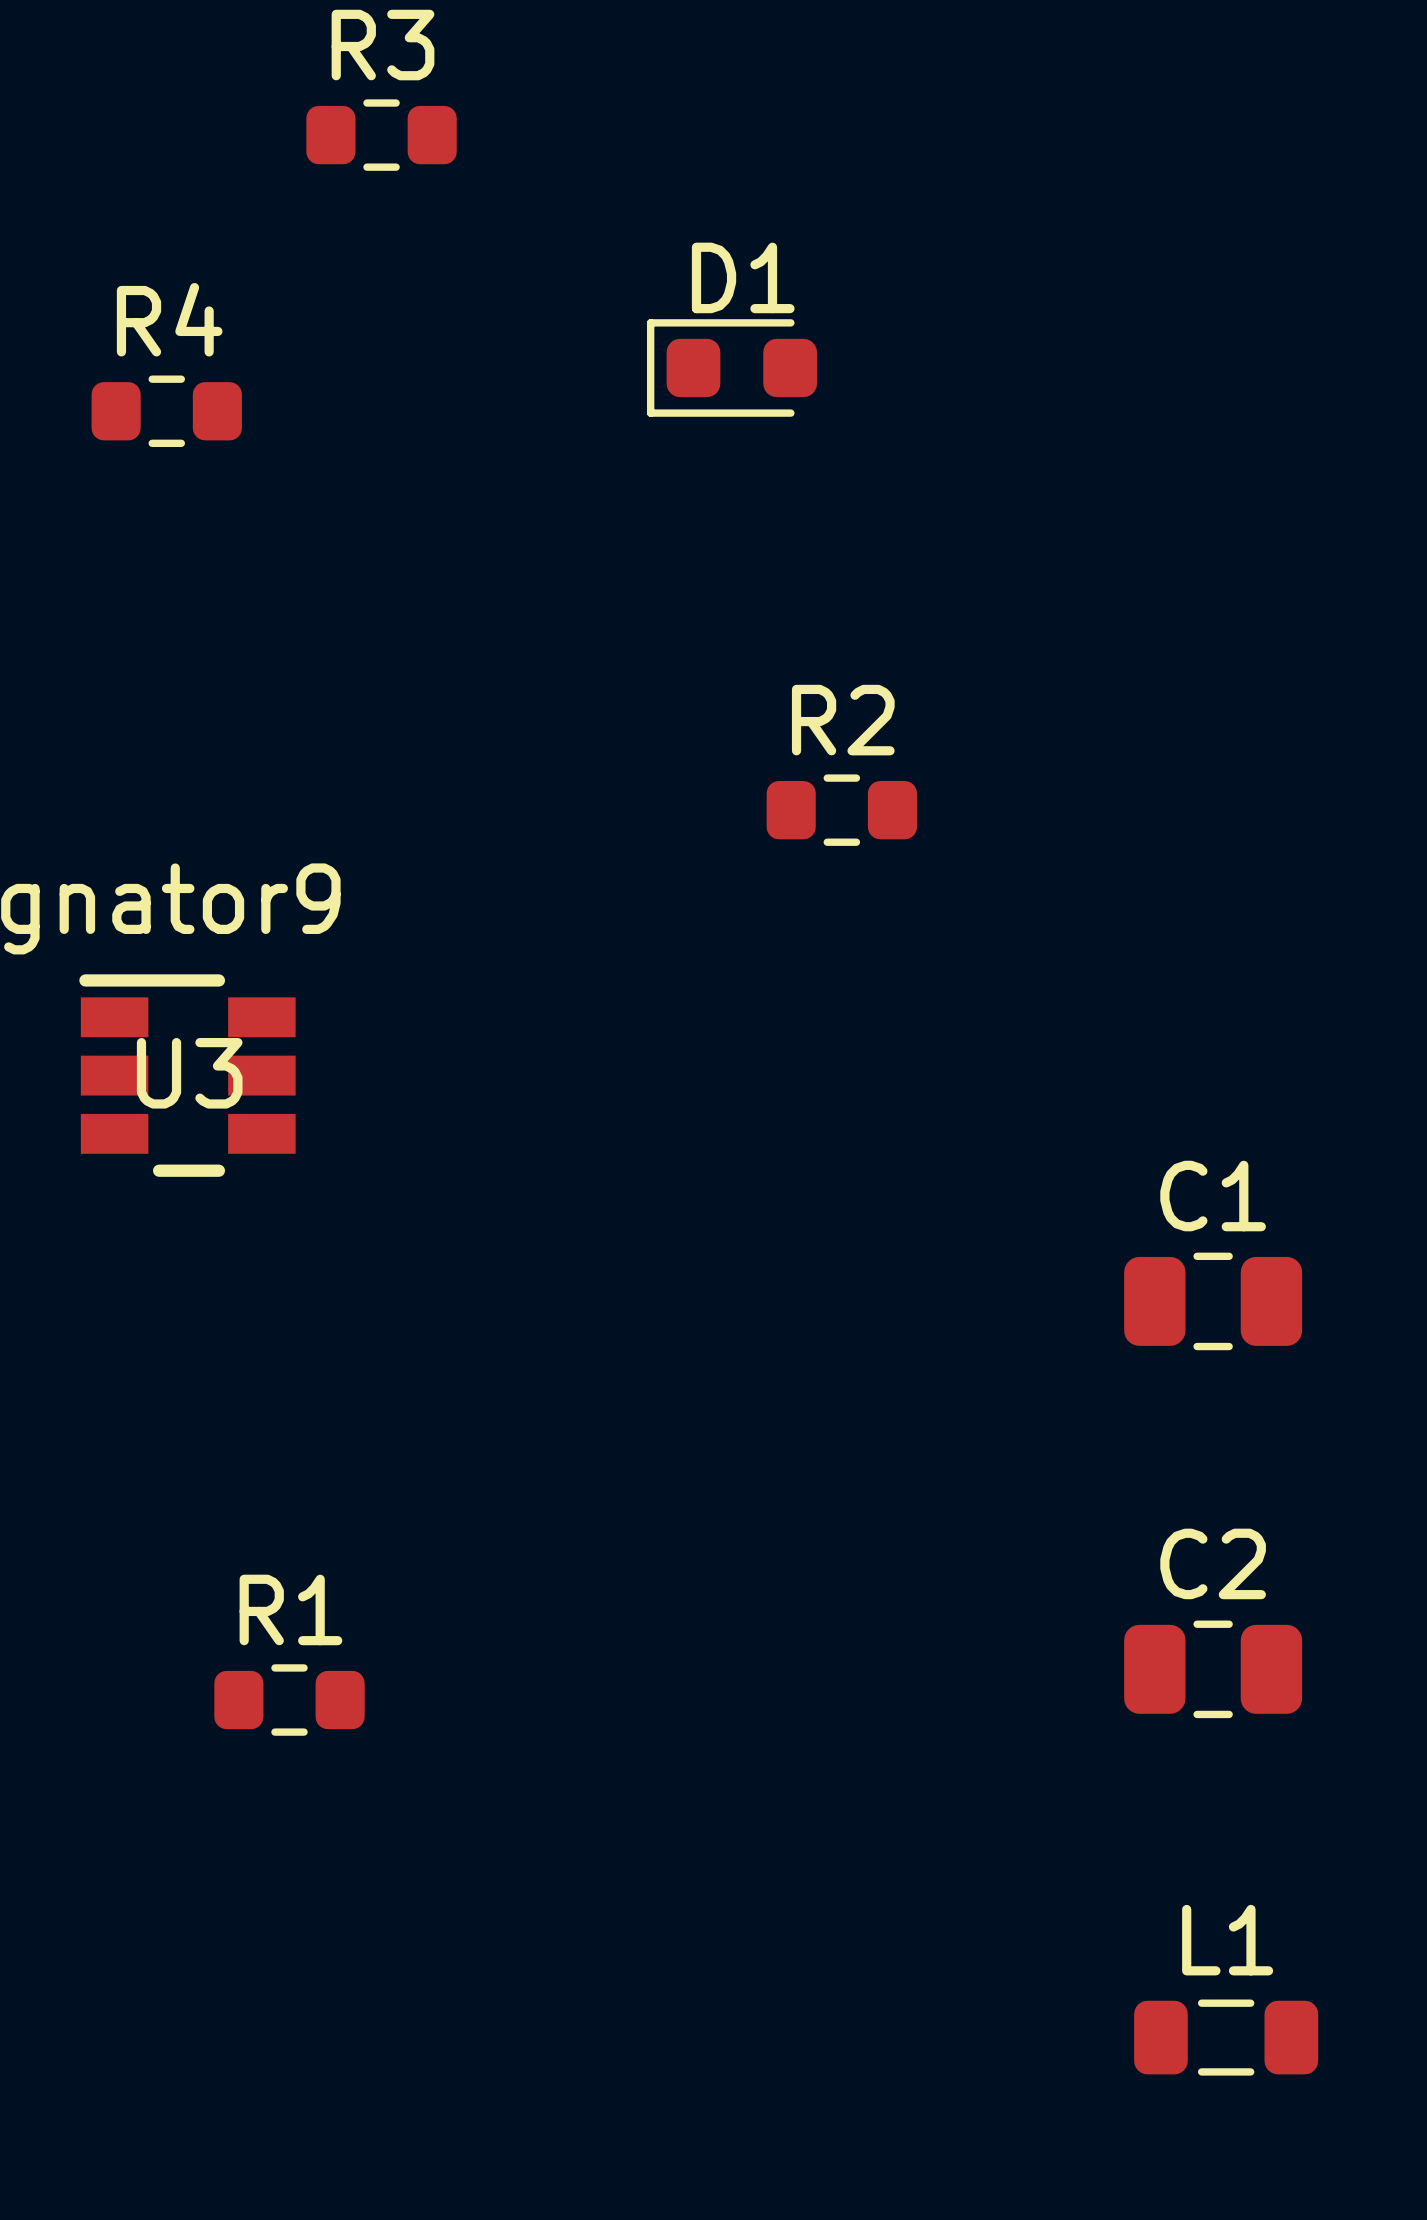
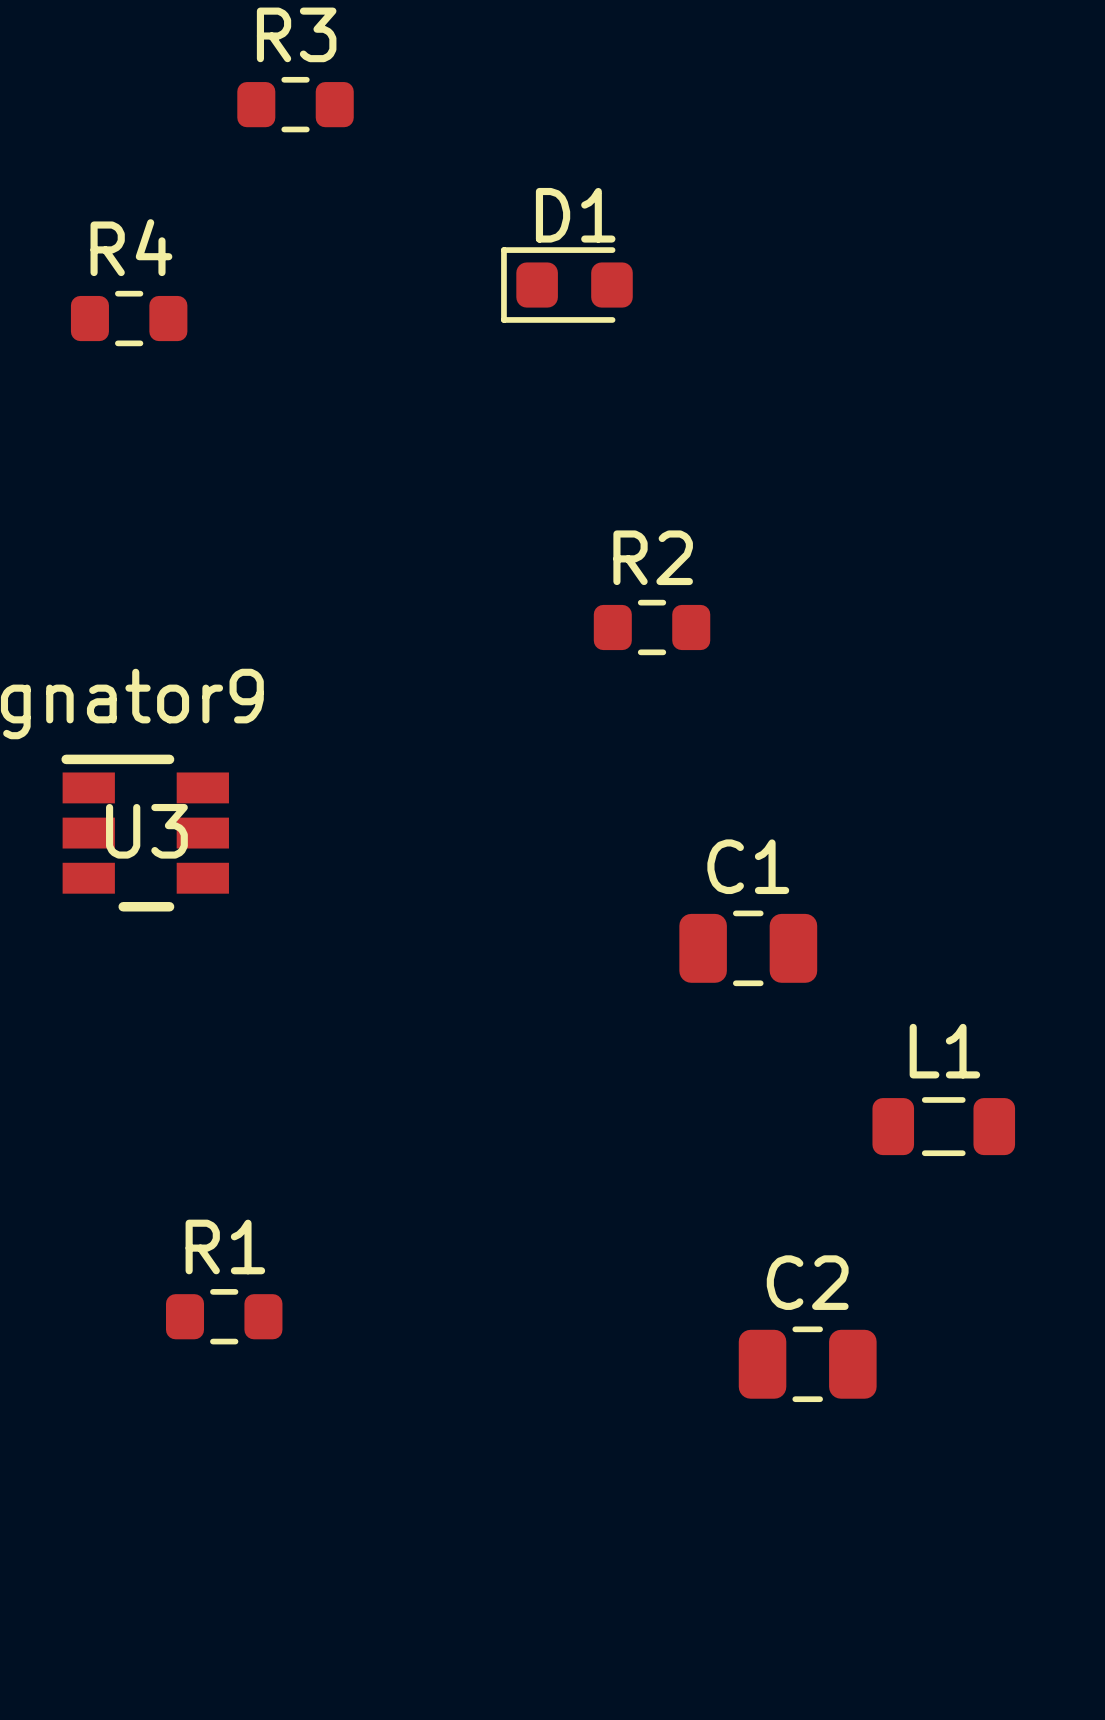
C1 position: (1213, 1301) -> (748, 948)
C2 position: (1213, 1669) -> (807, 1364)
L1 position: (1226, 2037) -> (943, 1126)

